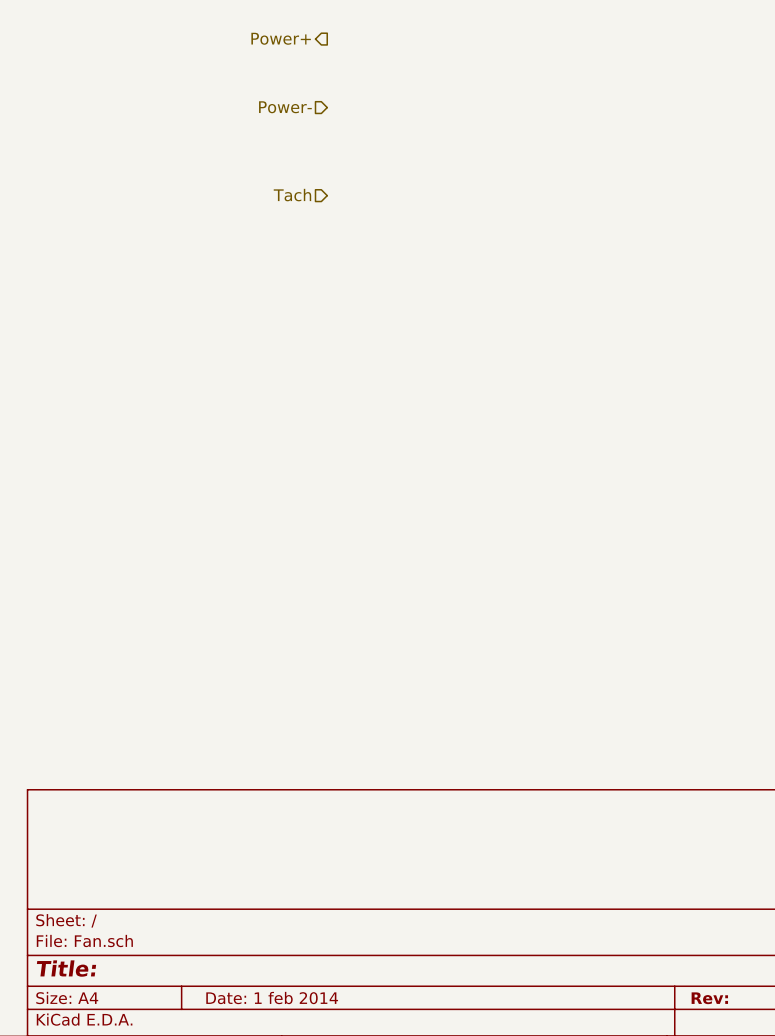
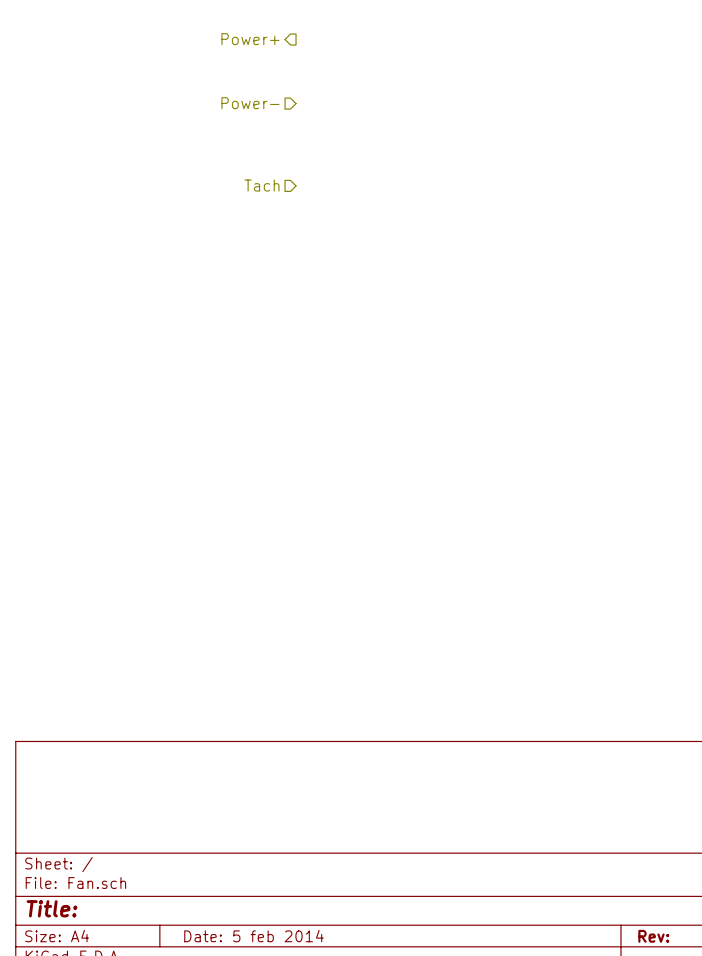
title block: Date: 1 feb 2014 (272, 998) -> Date: 5 feb 2014 (253, 936)

